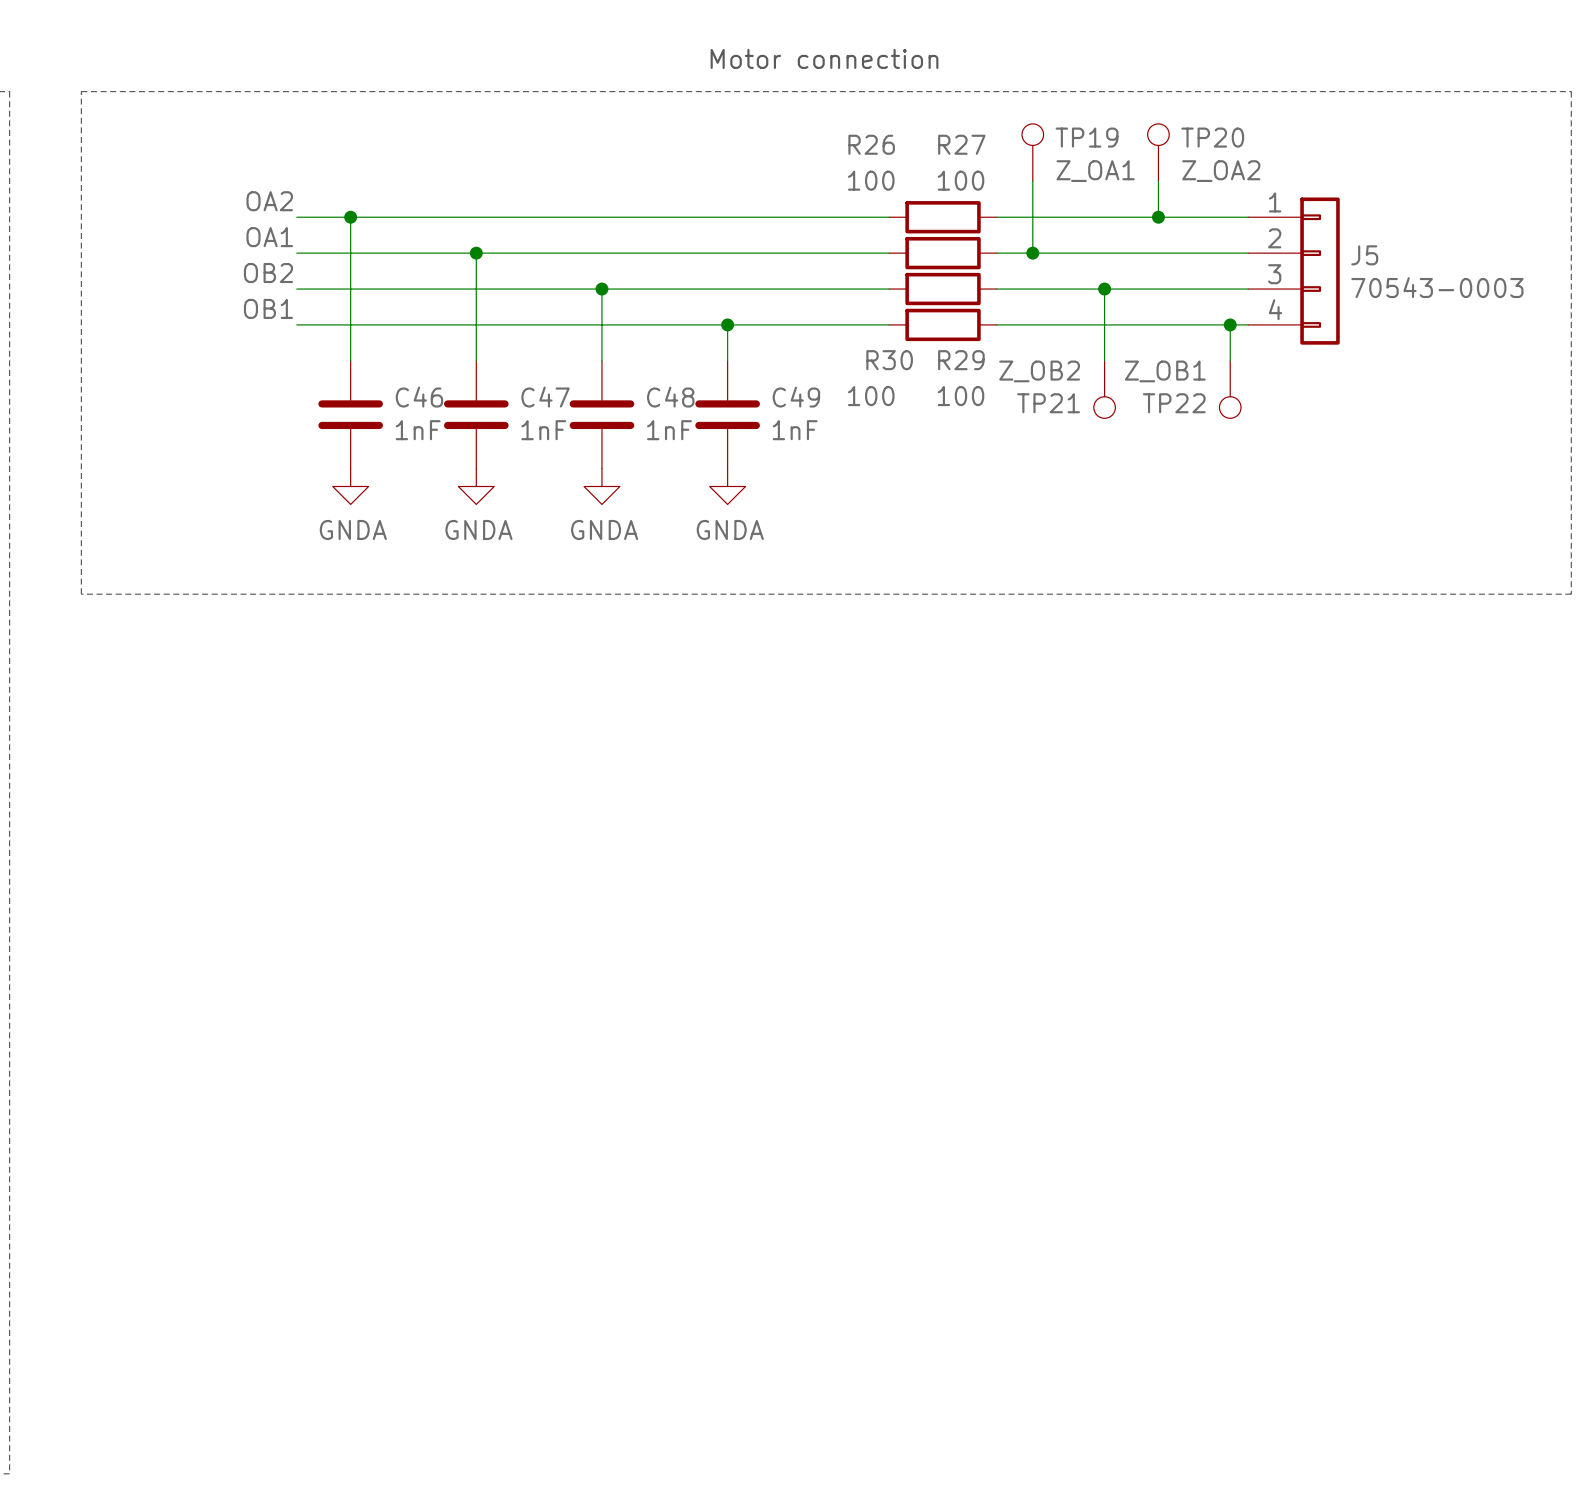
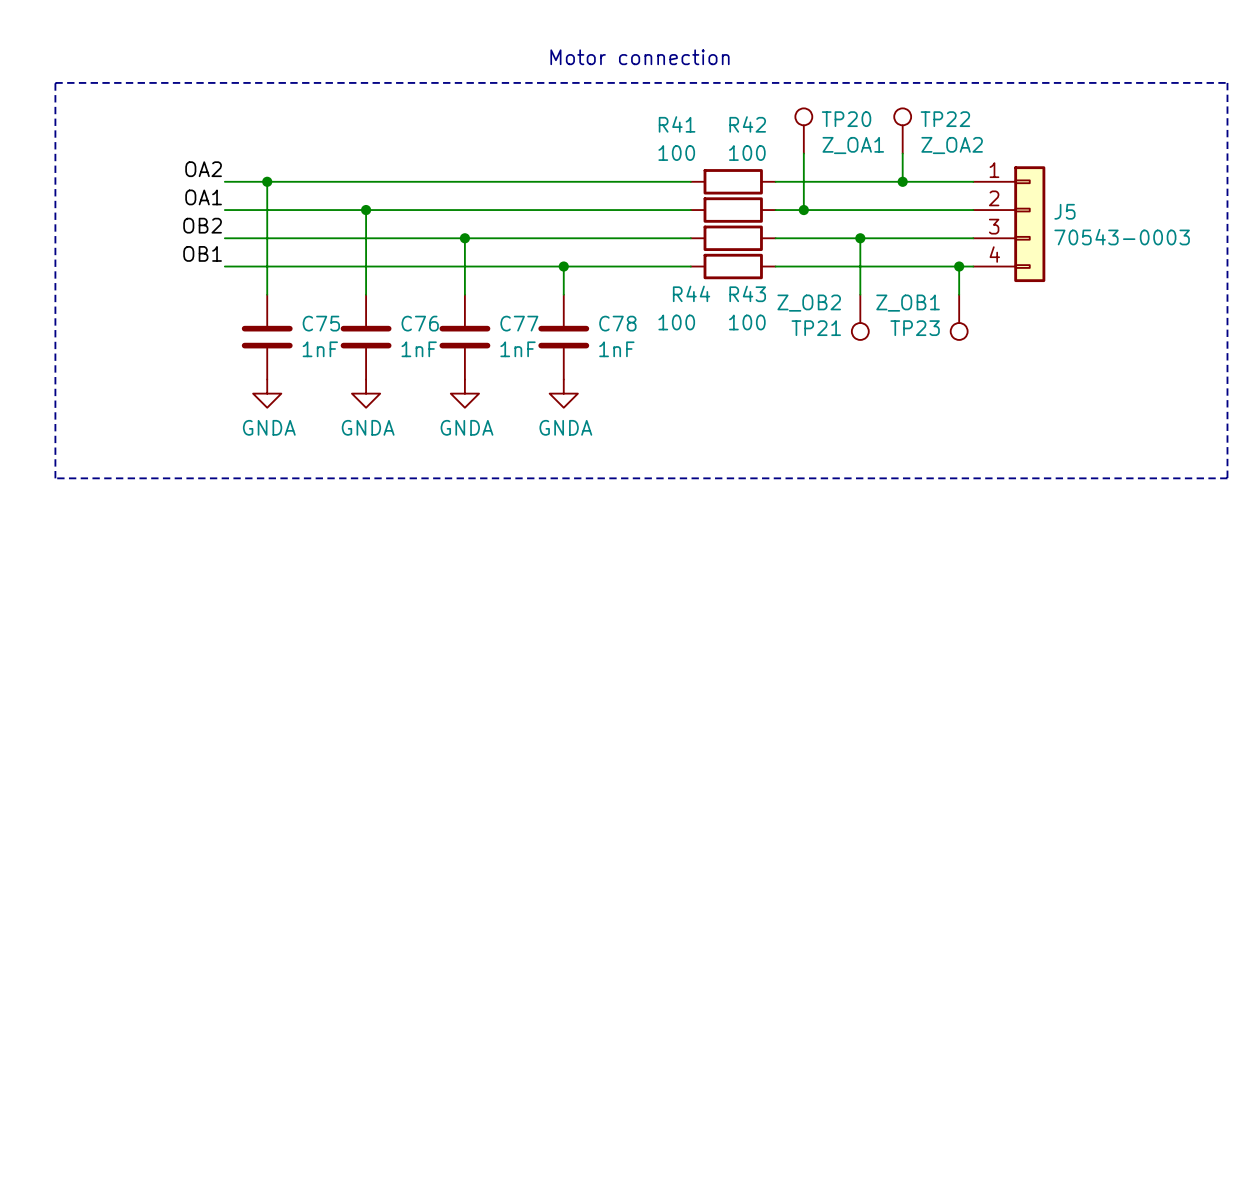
TP19 name: TP19 (1087, 137) -> TP20 (846, 119)
TP20 name: TP20 (1212, 137) -> TP22 (945, 119)
R26 name: R26 (871, 144) -> R41 (677, 124)
R27 name: R27 (961, 144) -> R42 (747, 124)
R30 name: R30 (889, 360) -> R44 (691, 293)
R29 name: R29 (961, 360) -> R43 (747, 293)
C46 name: C46 (419, 397) -> C75 (321, 323)
C47 name: C47 (545, 397) -> C76 (420, 323)
C48 name: C48 (670, 397) -> C77 (519, 323)
C49 name: C49 (796, 397) -> C78 (617, 323)
TP22 name: TP22 (1174, 403) -> TP23 (915, 328)

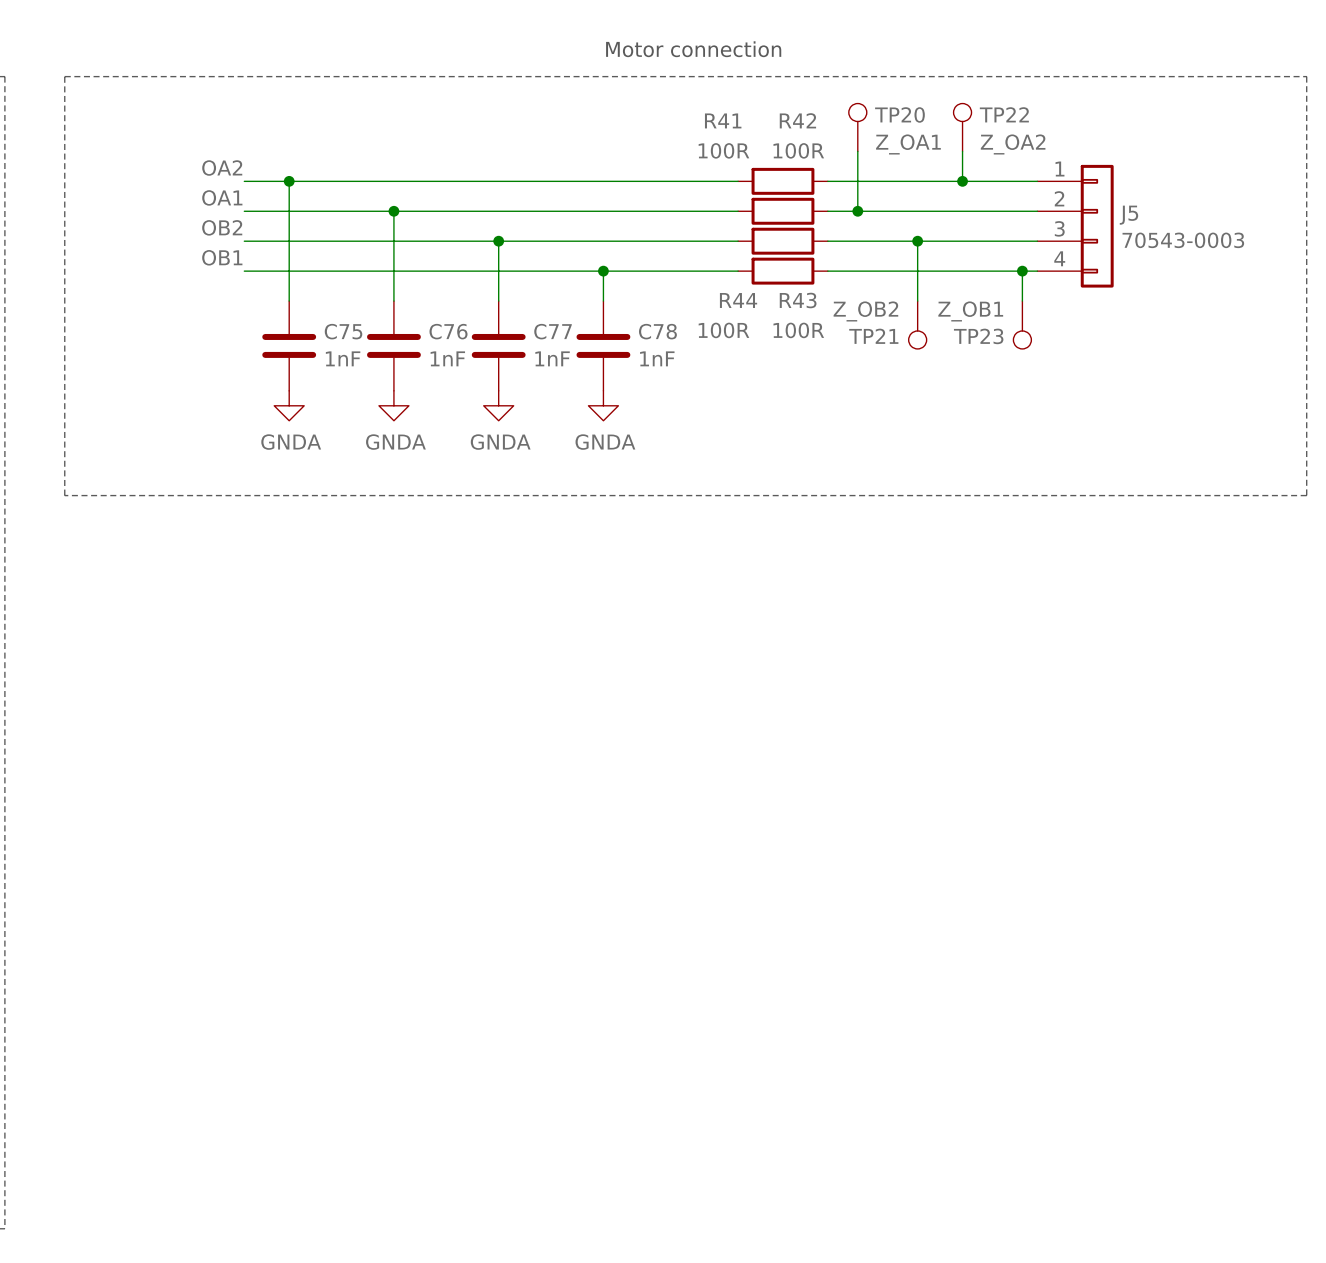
R41 value: 100 (676, 153) -> 100R (723, 150)
R42 value: 100 (747, 153) -> 100R (798, 150)
R44 value: 100 (676, 322) -> 100R (723, 330)
R43 value: 100 (747, 322) -> 100R (798, 330)

